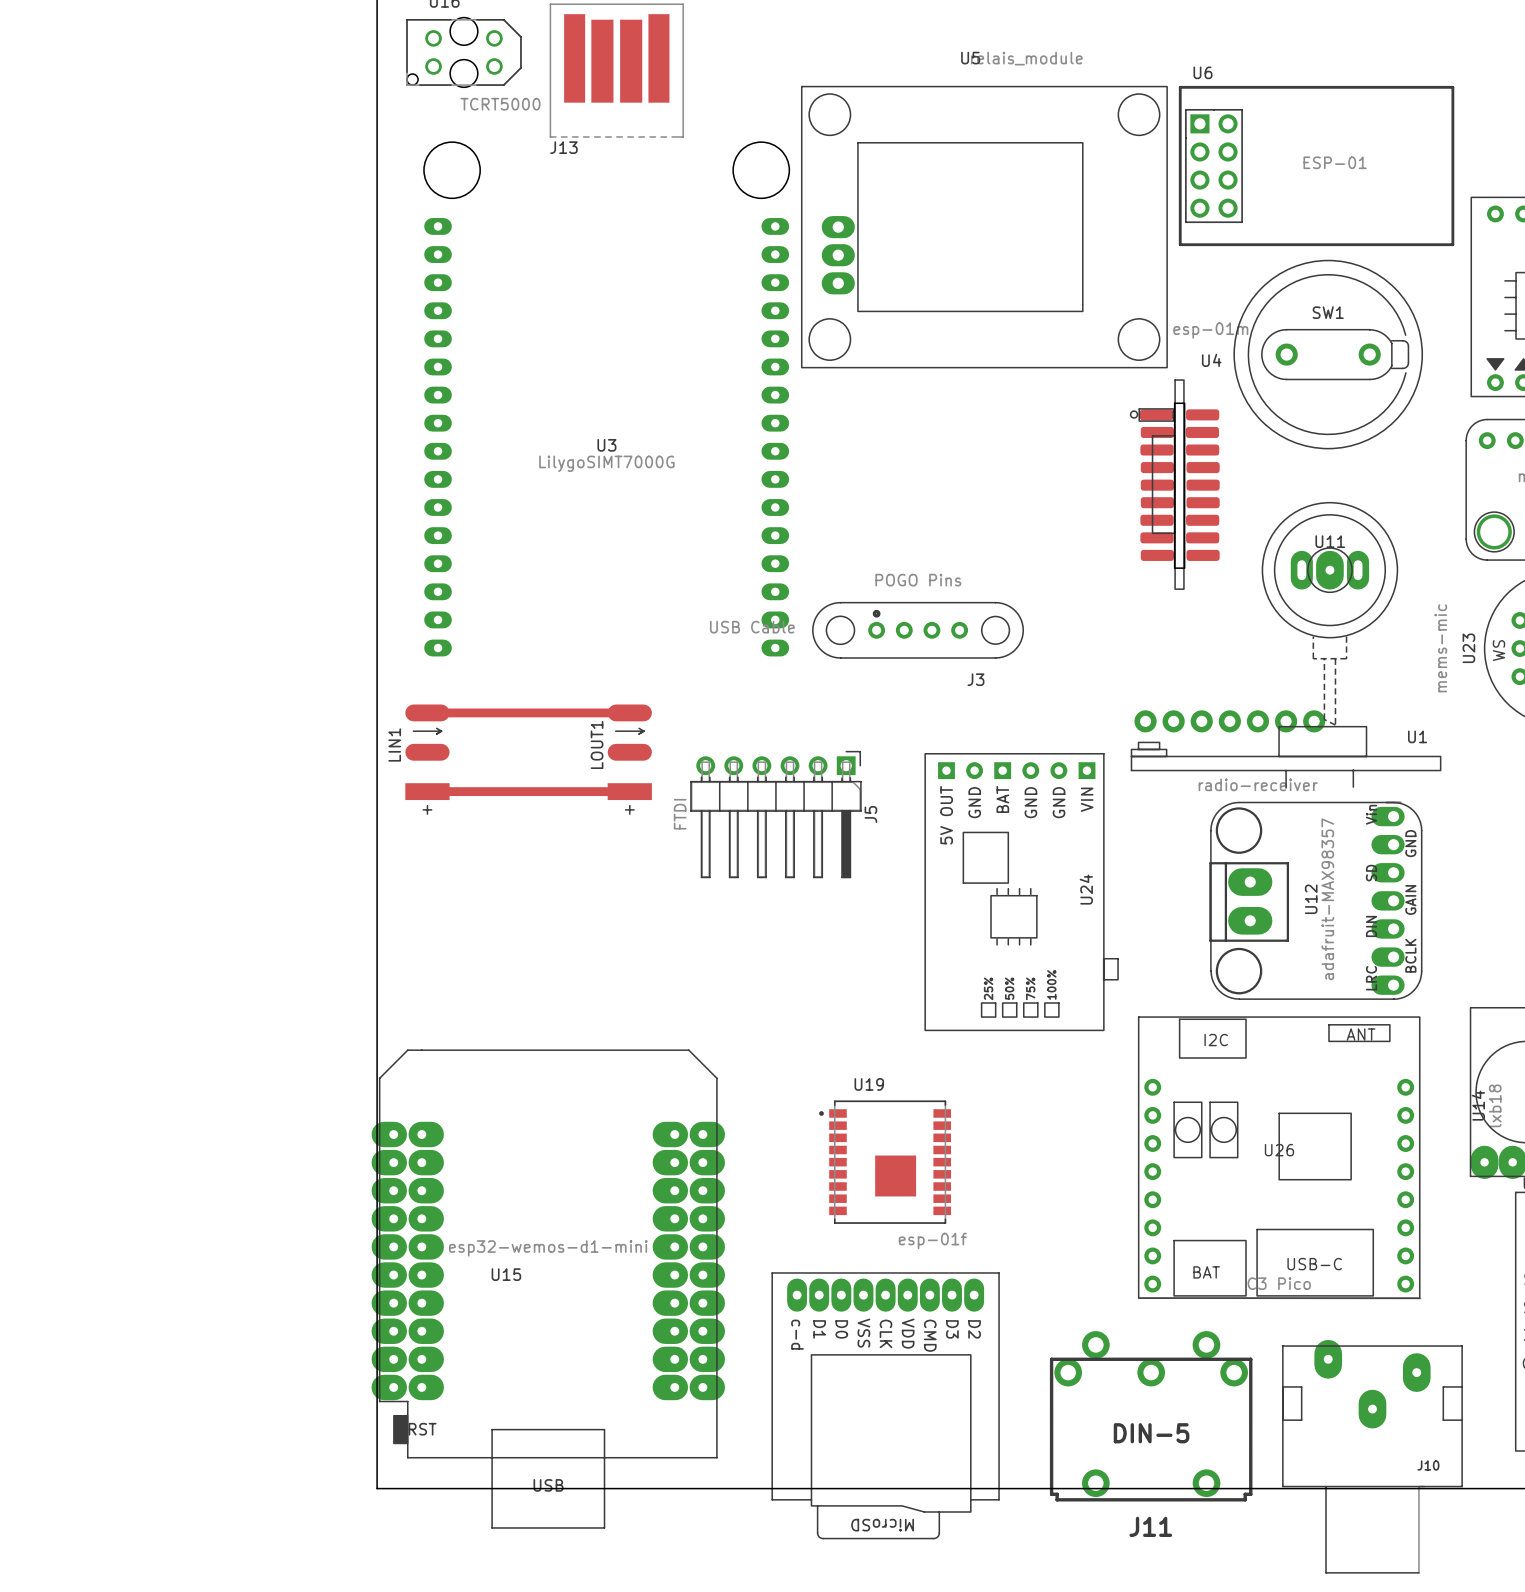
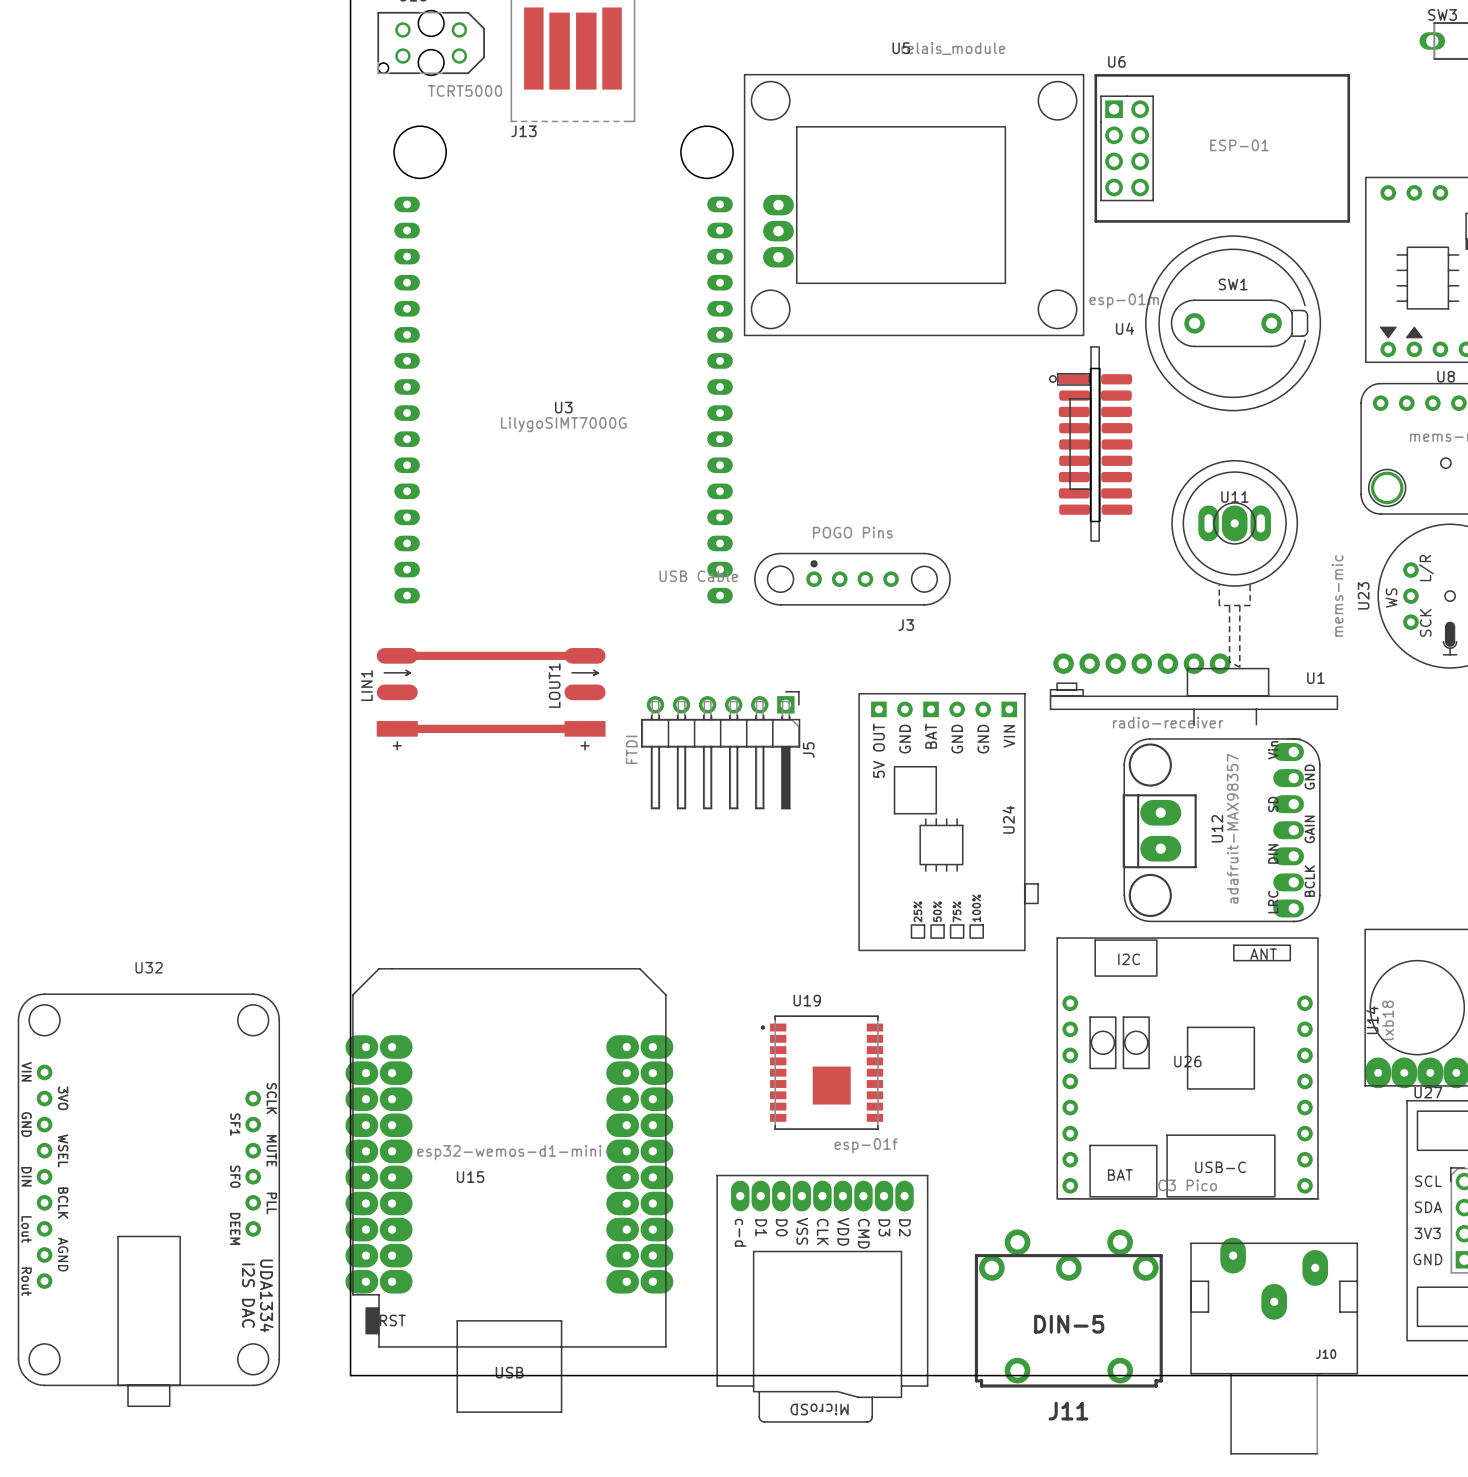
U32: none -> (148, 1200)

